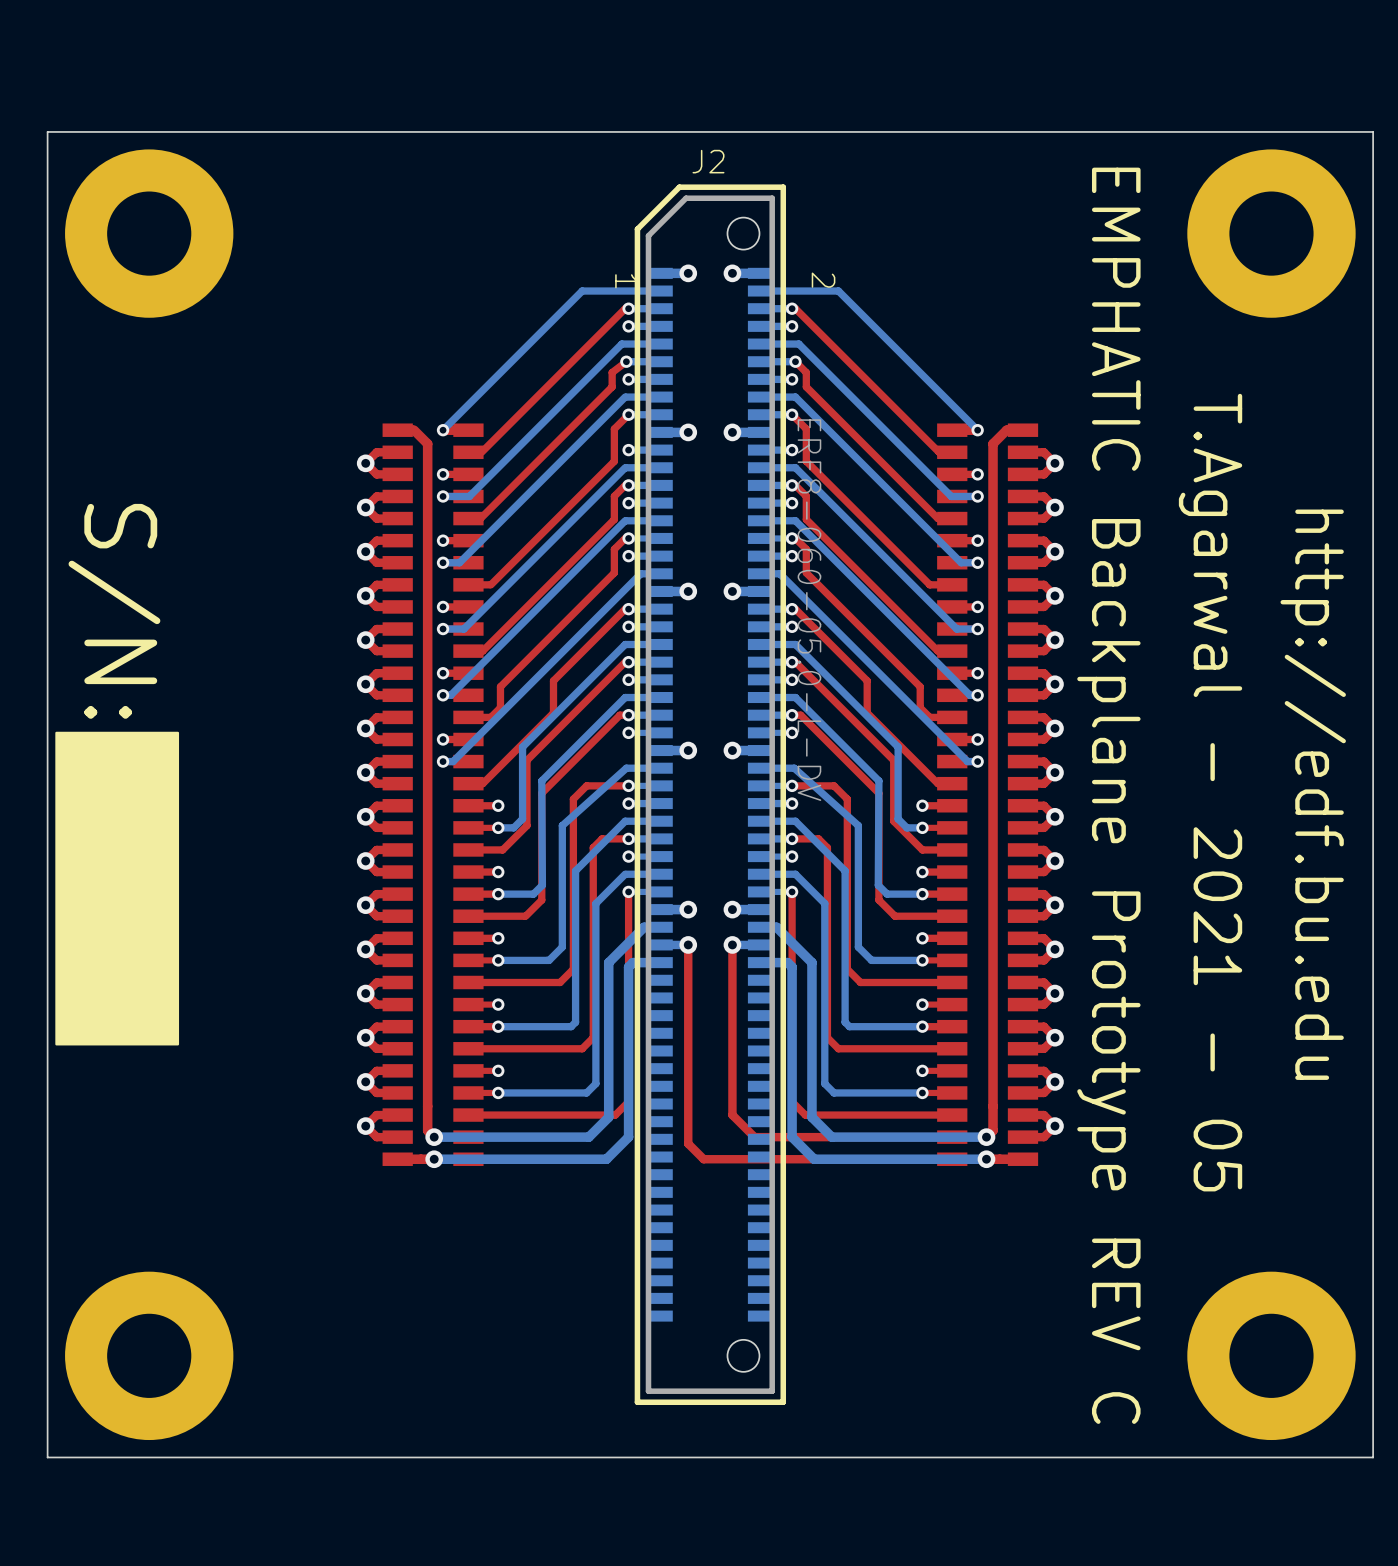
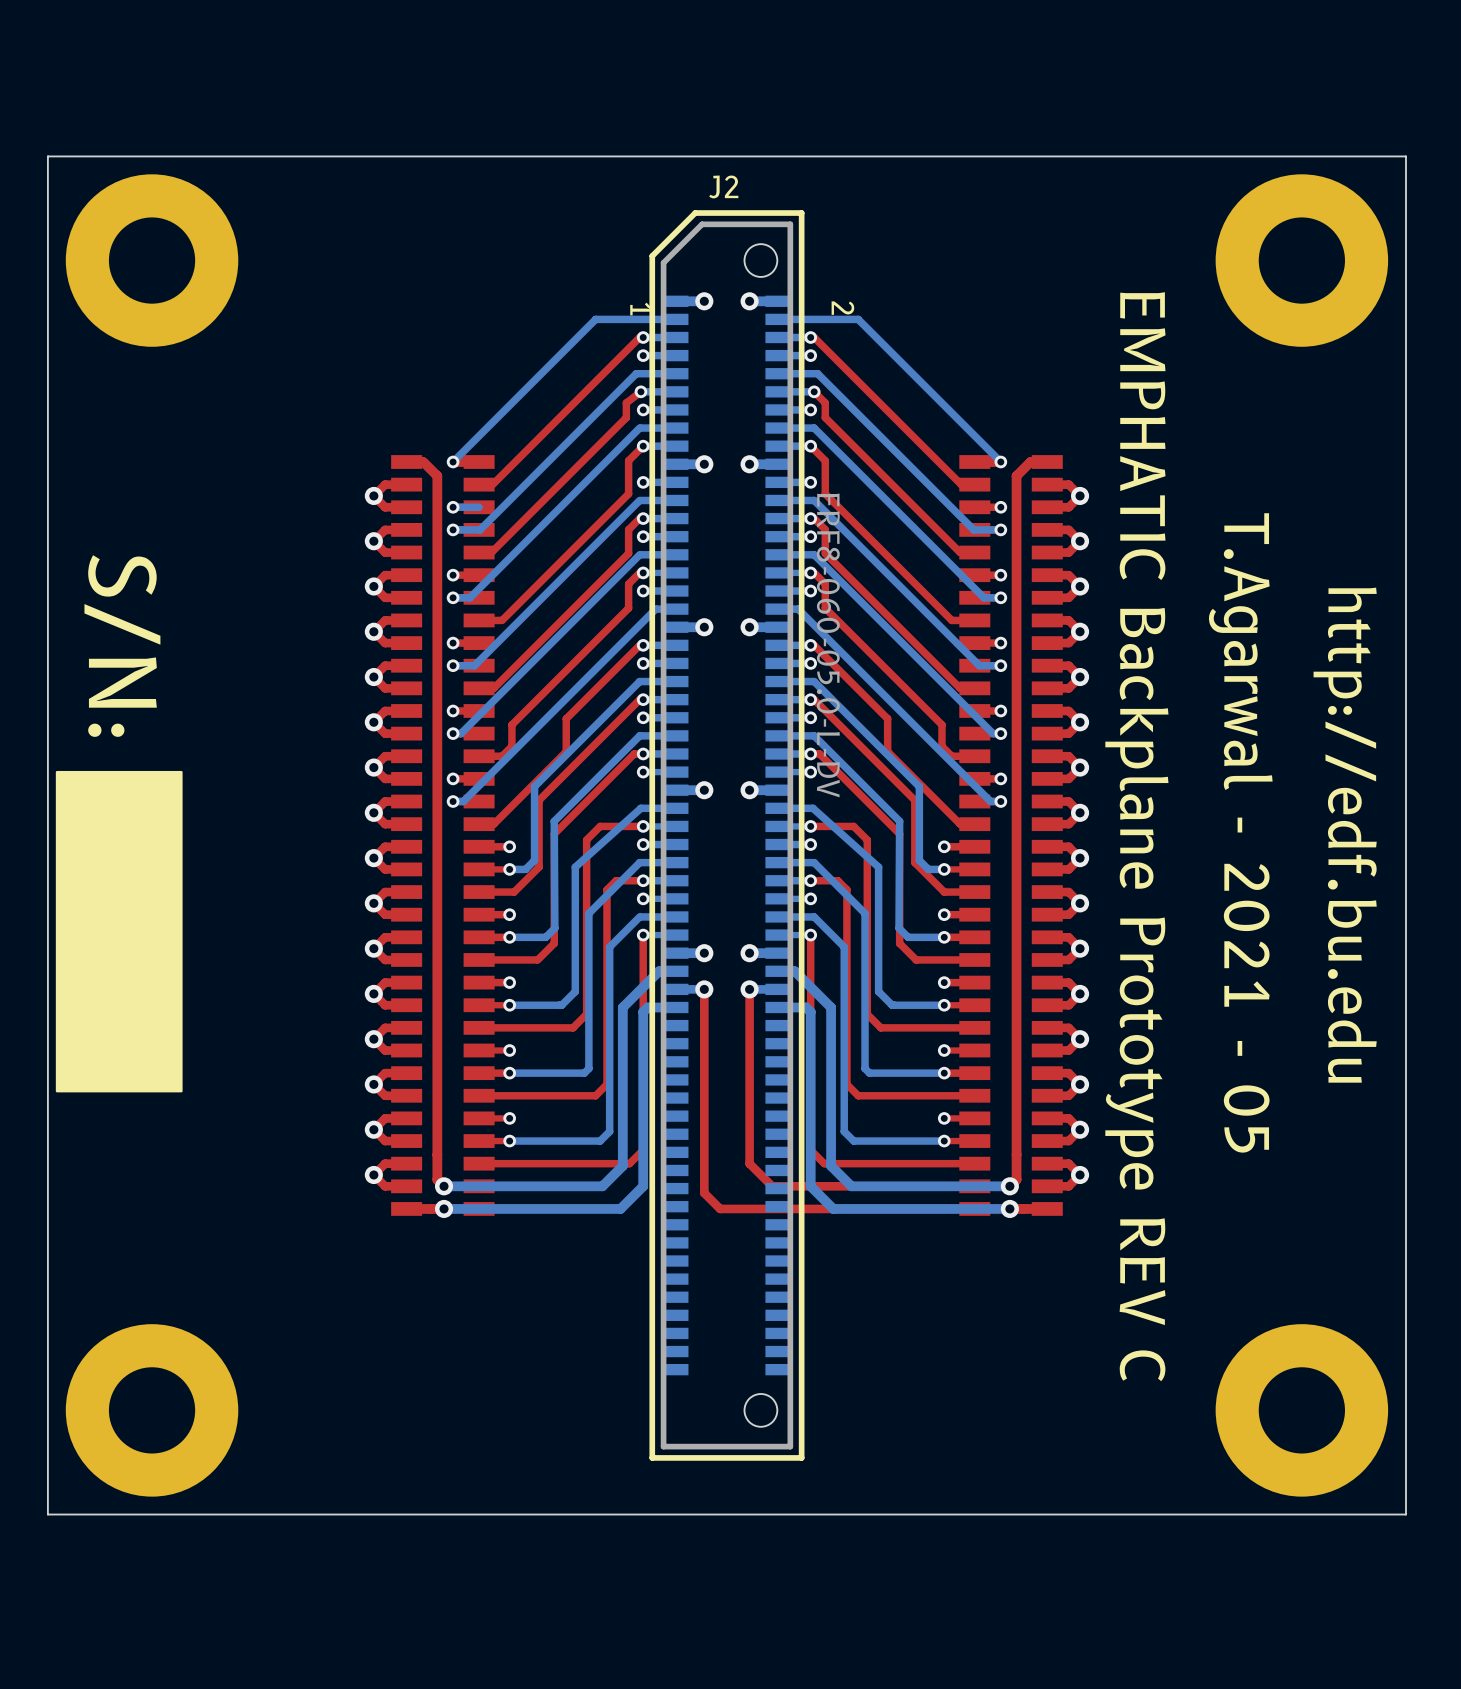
bottom track: none -> (479, 507) (453, 507)

